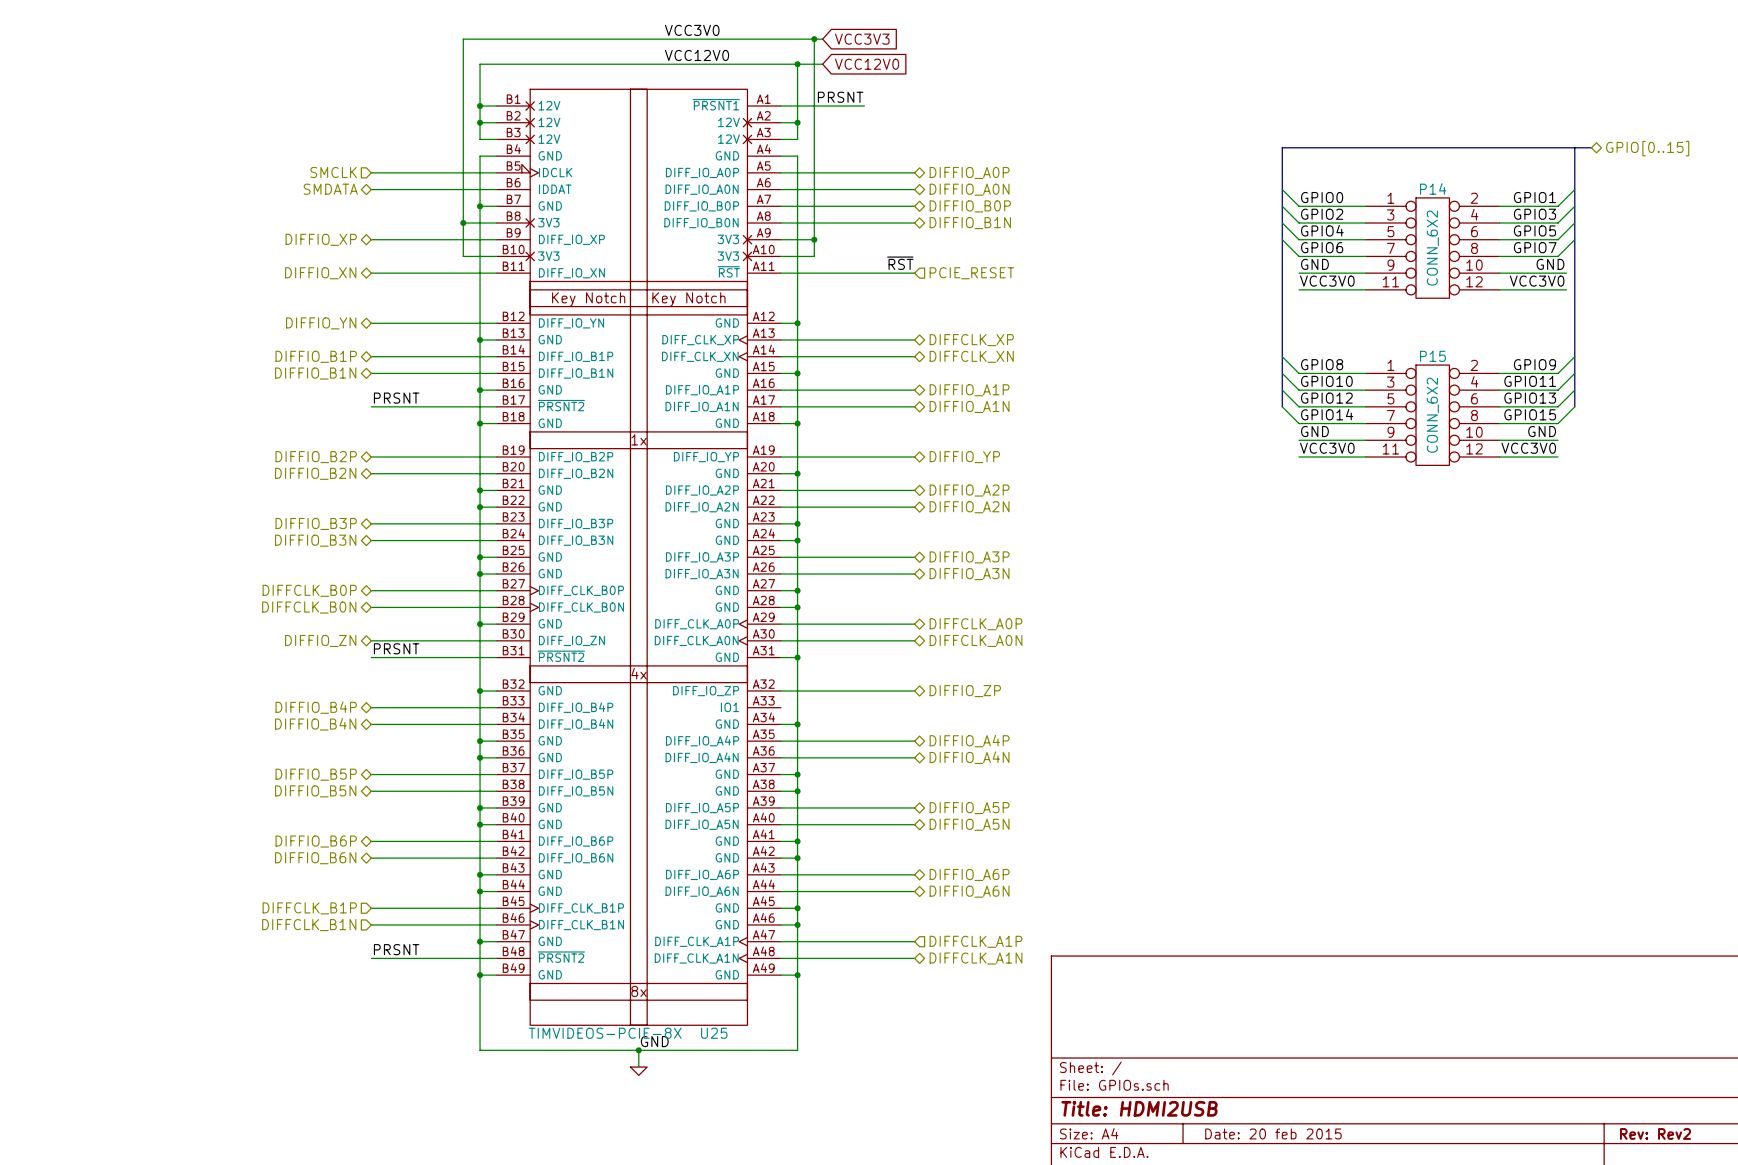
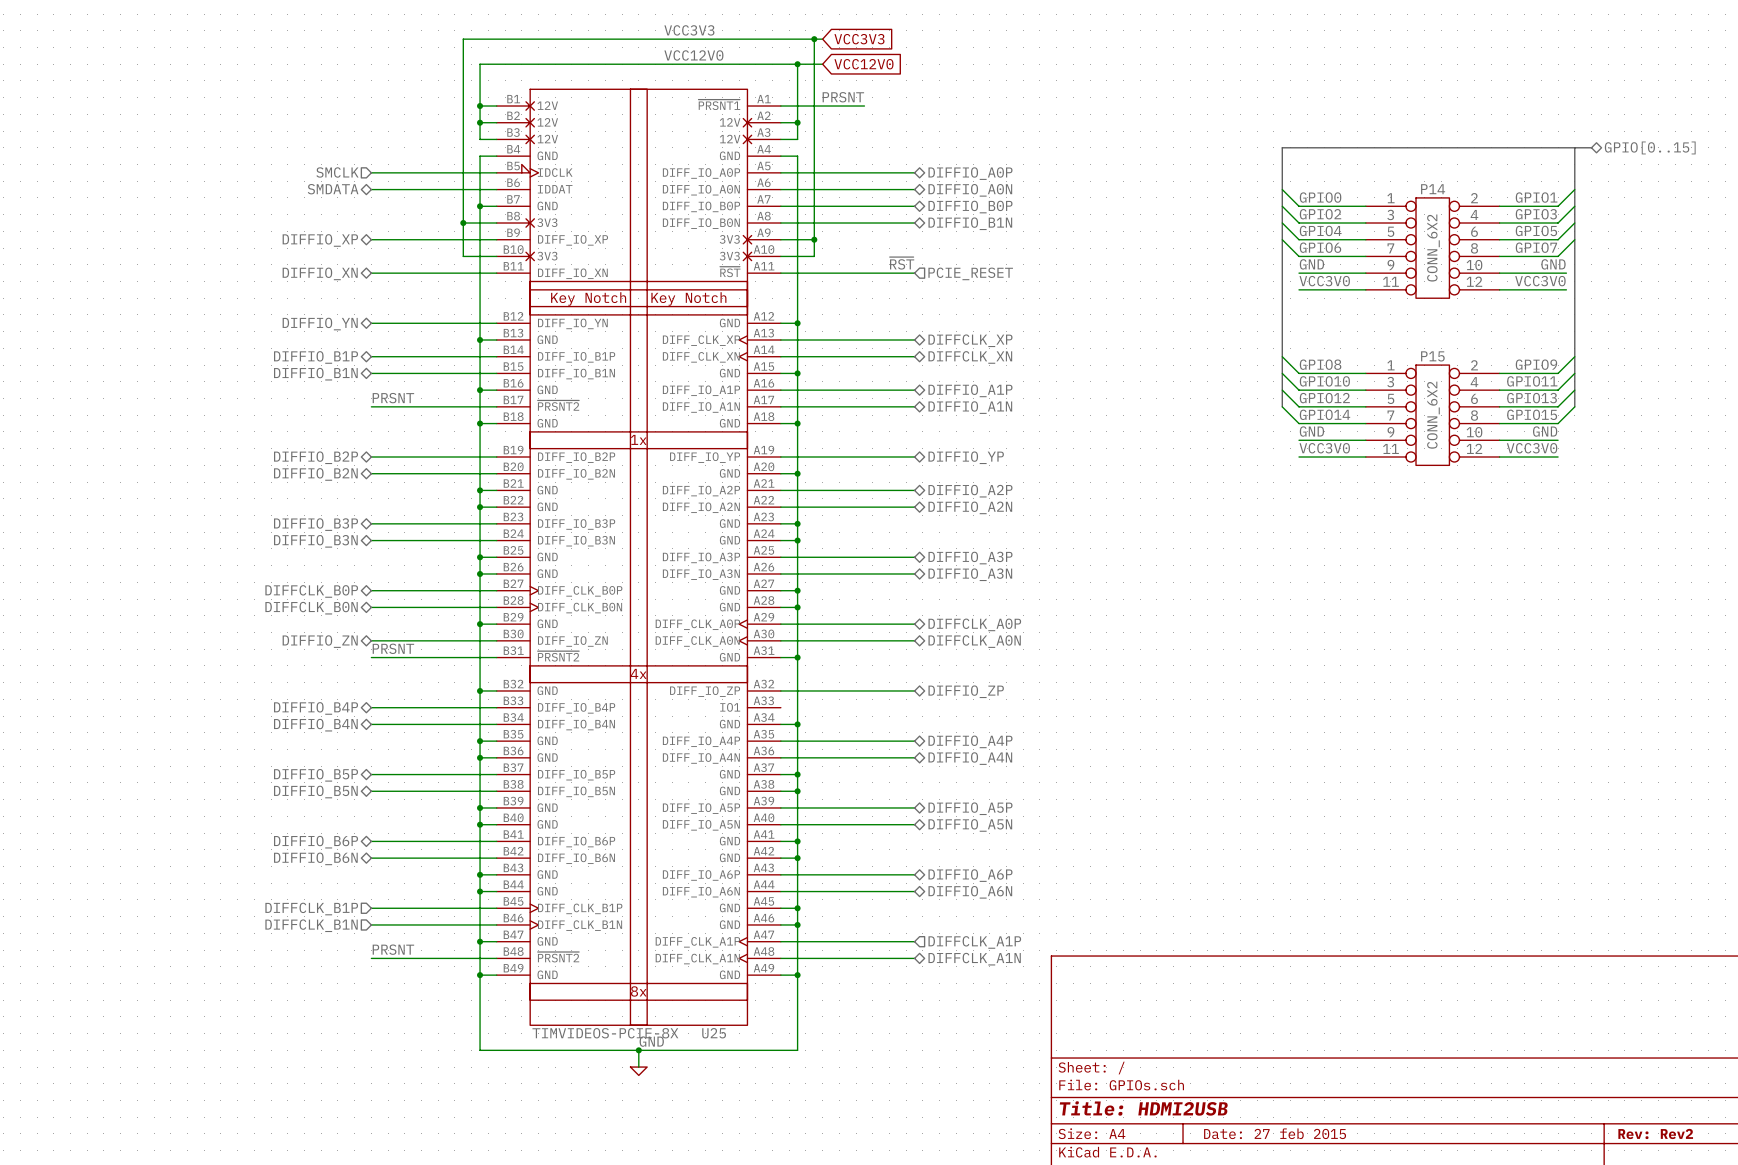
label: VCC3V0 (692, 30) -> VCC3V3 (689, 30)
title block: Date: 20 feb 2015 (1273, 1133) -> Date: 27 feb 2015 (1275, 1133)

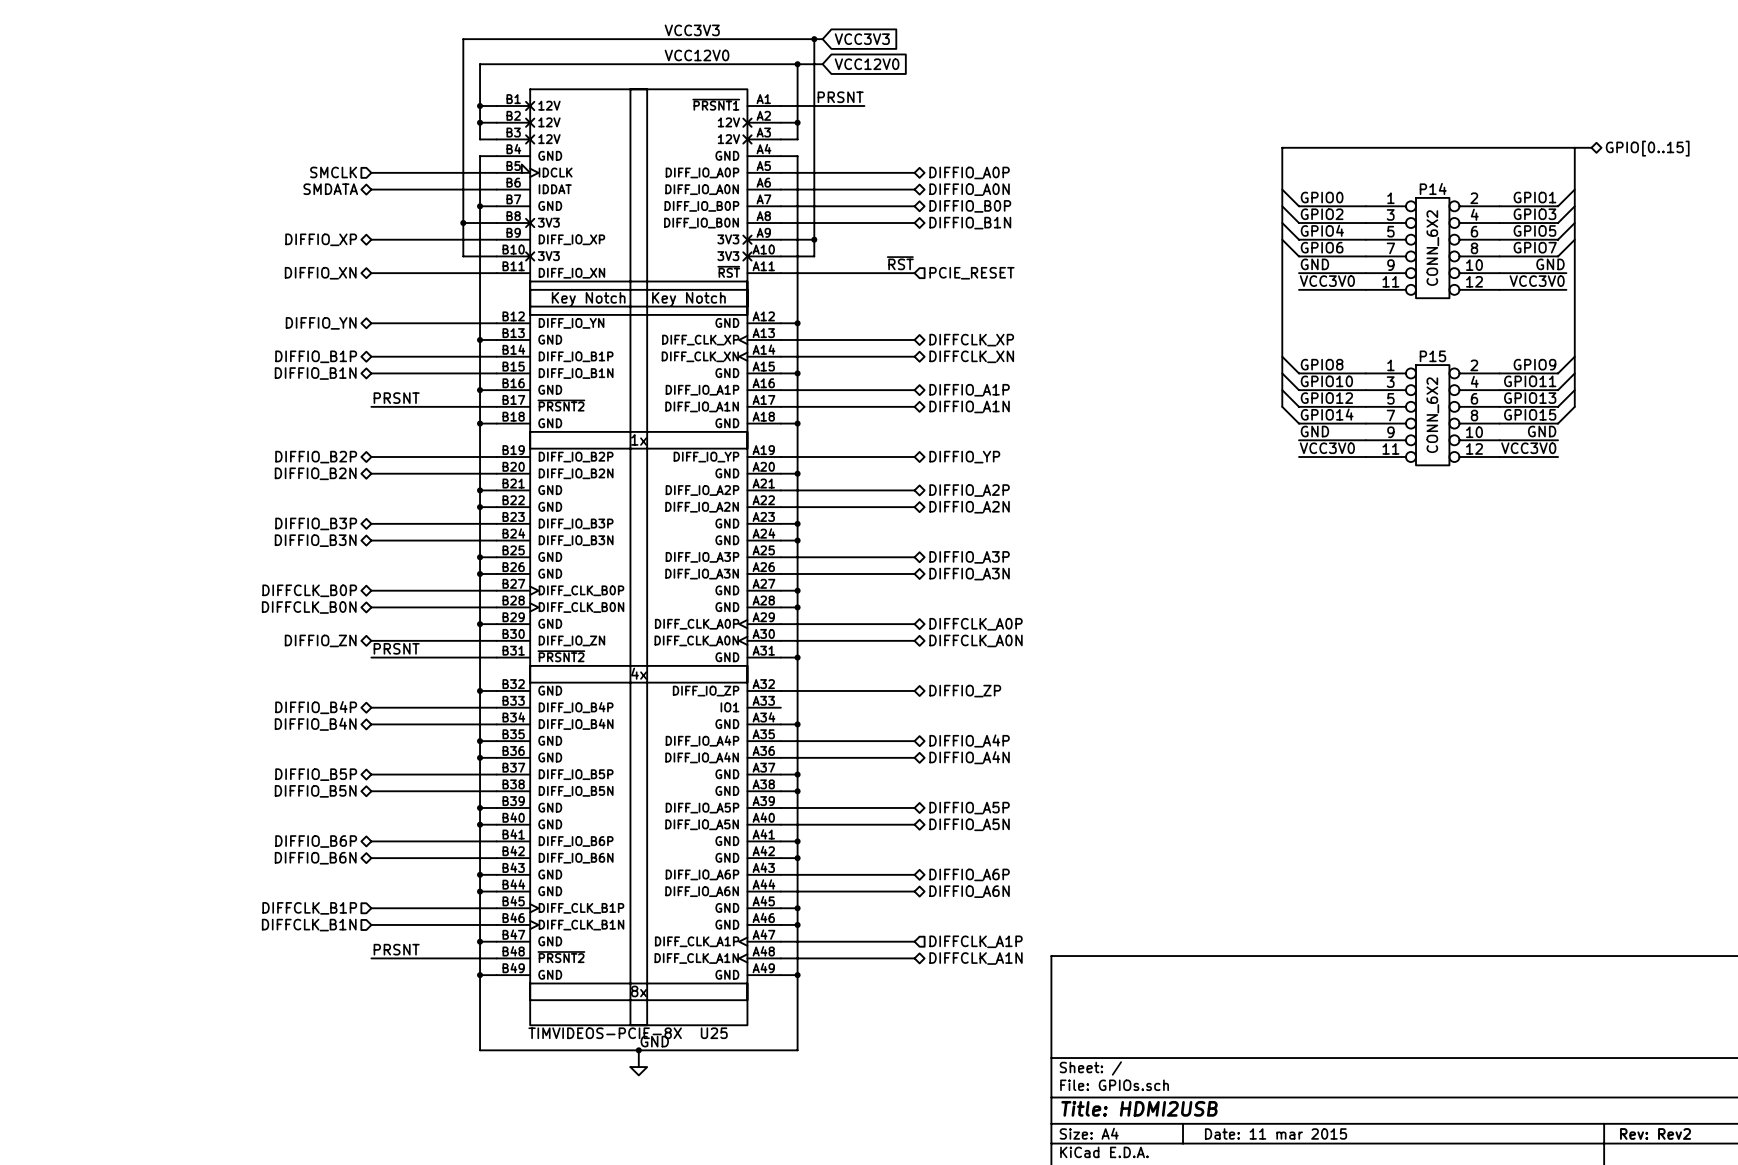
title block: Date: 27 feb 2015 (1275, 1133) -> Date: 11 mar 2015 (1276, 1133)

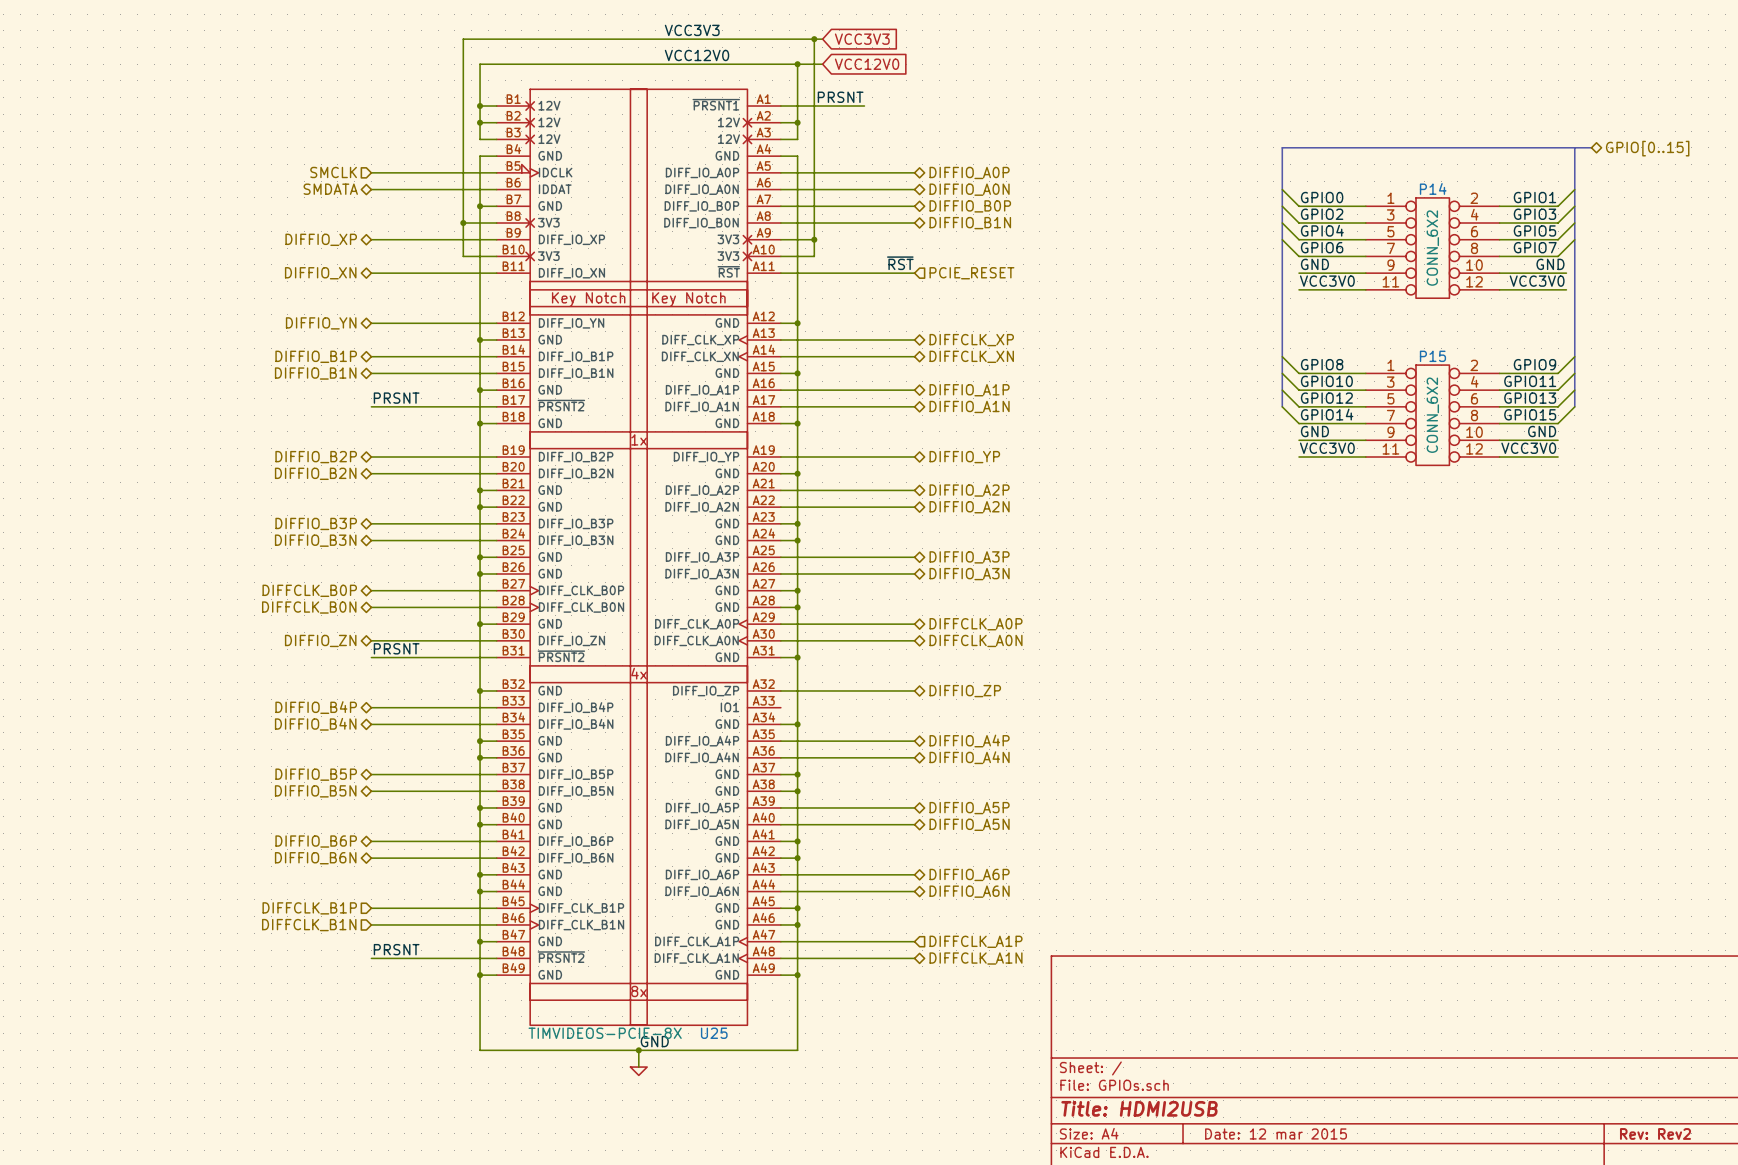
title block: Date: 11 mar 2015 (1276, 1133) -> Date: 12 mar 2015 (1276, 1133)

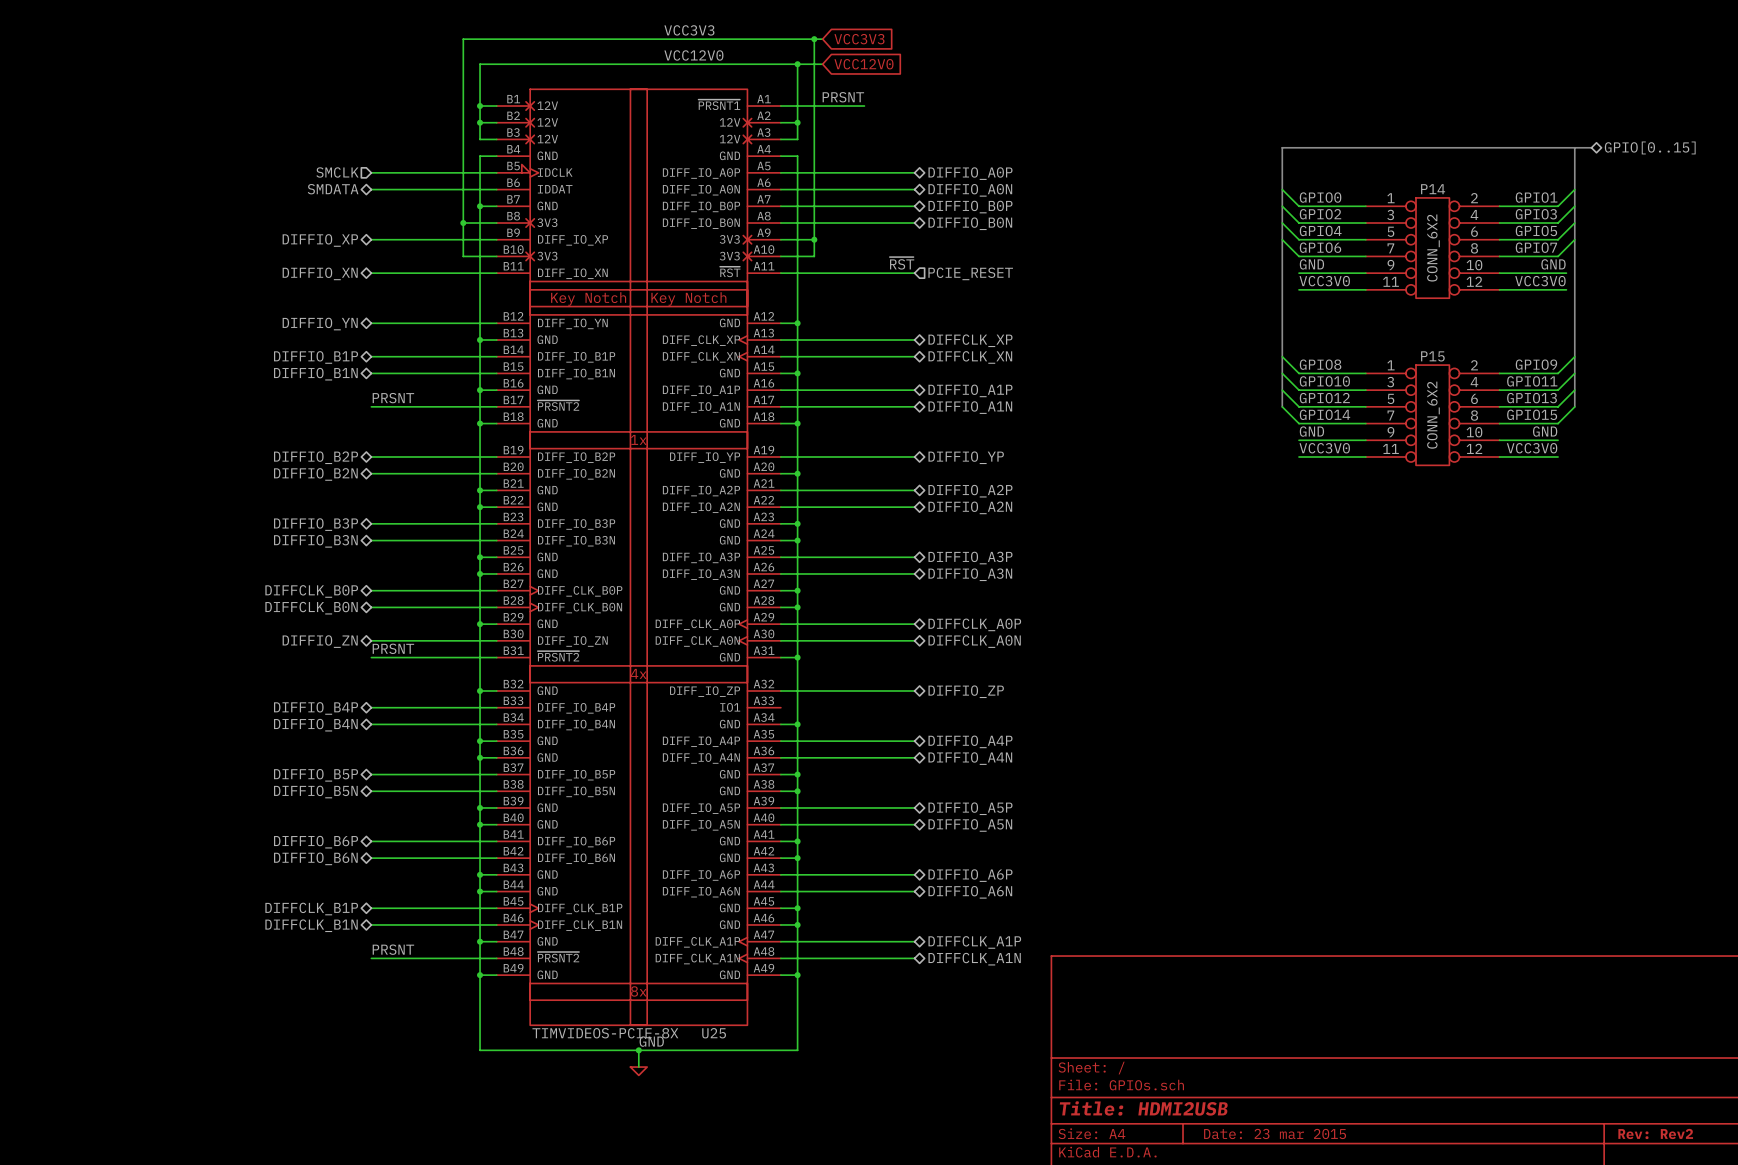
hierarchical label: DIFFIO_B1N (970, 223) -> DIFFIO_B0N (970, 223)
hierarchical label shape: input (309, 908) -> bidirectional (311, 909)
hierarchical label shape: input (309, 925) -> bidirectional (311, 925)
hierarchical label shape: input (976, 941) -> bidirectional (974, 942)
title block: Date: 12 mar 2015 (1276, 1133) -> Date: 23 mar 2015 (1275, 1133)

